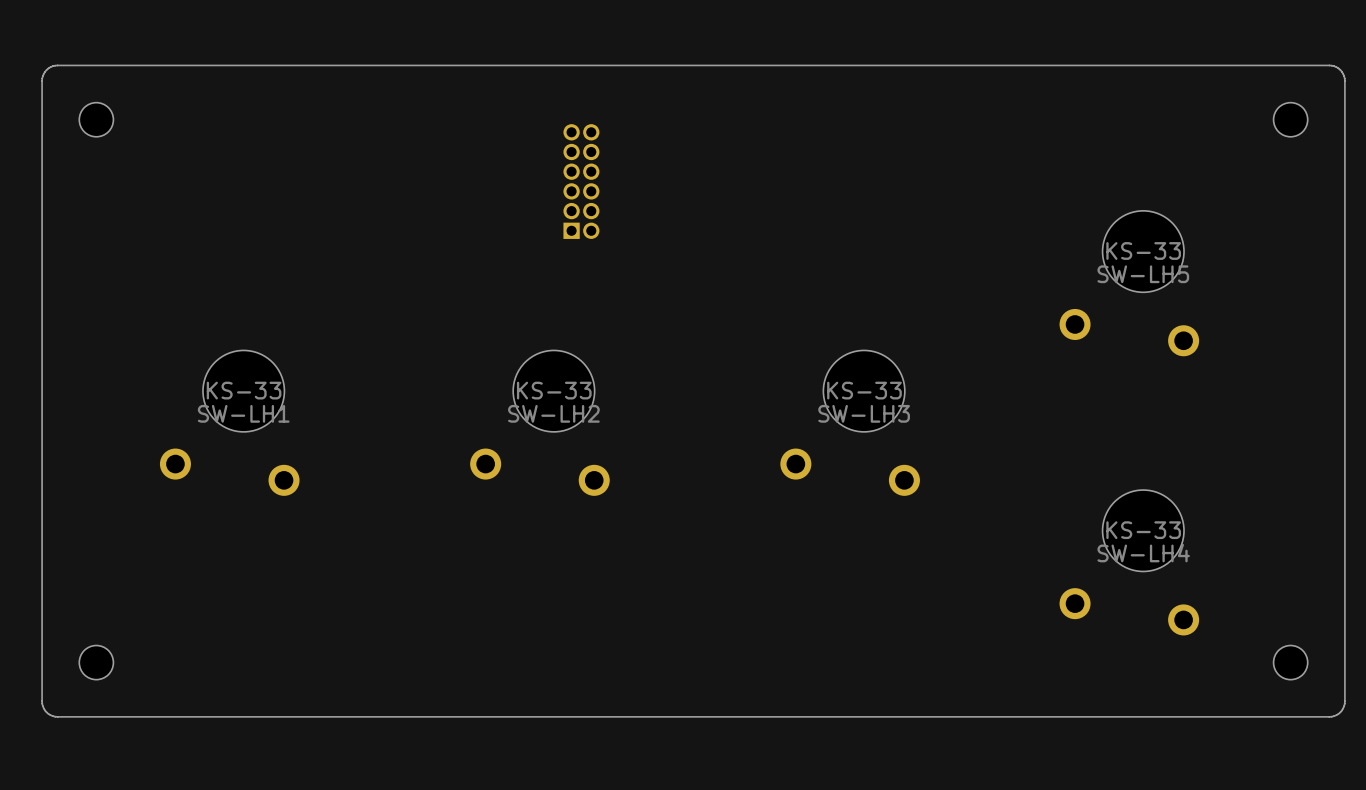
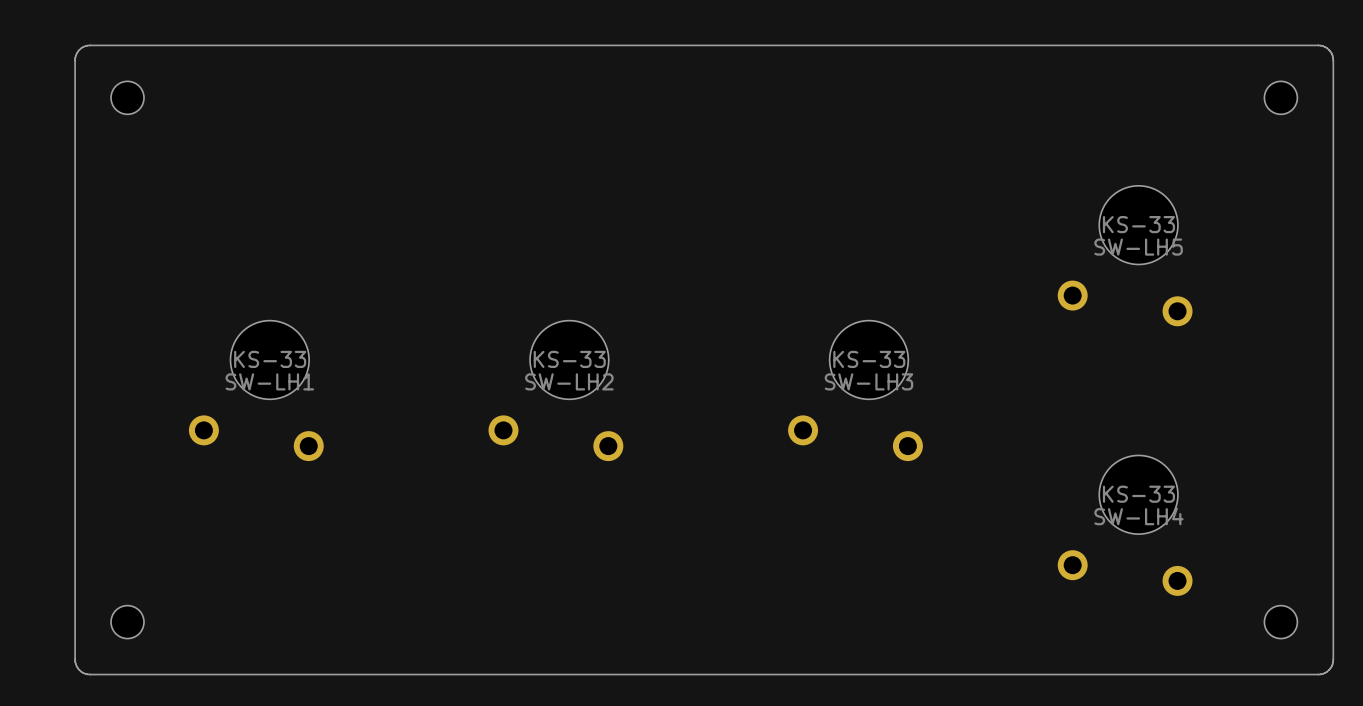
part: (581, 181) -> none

